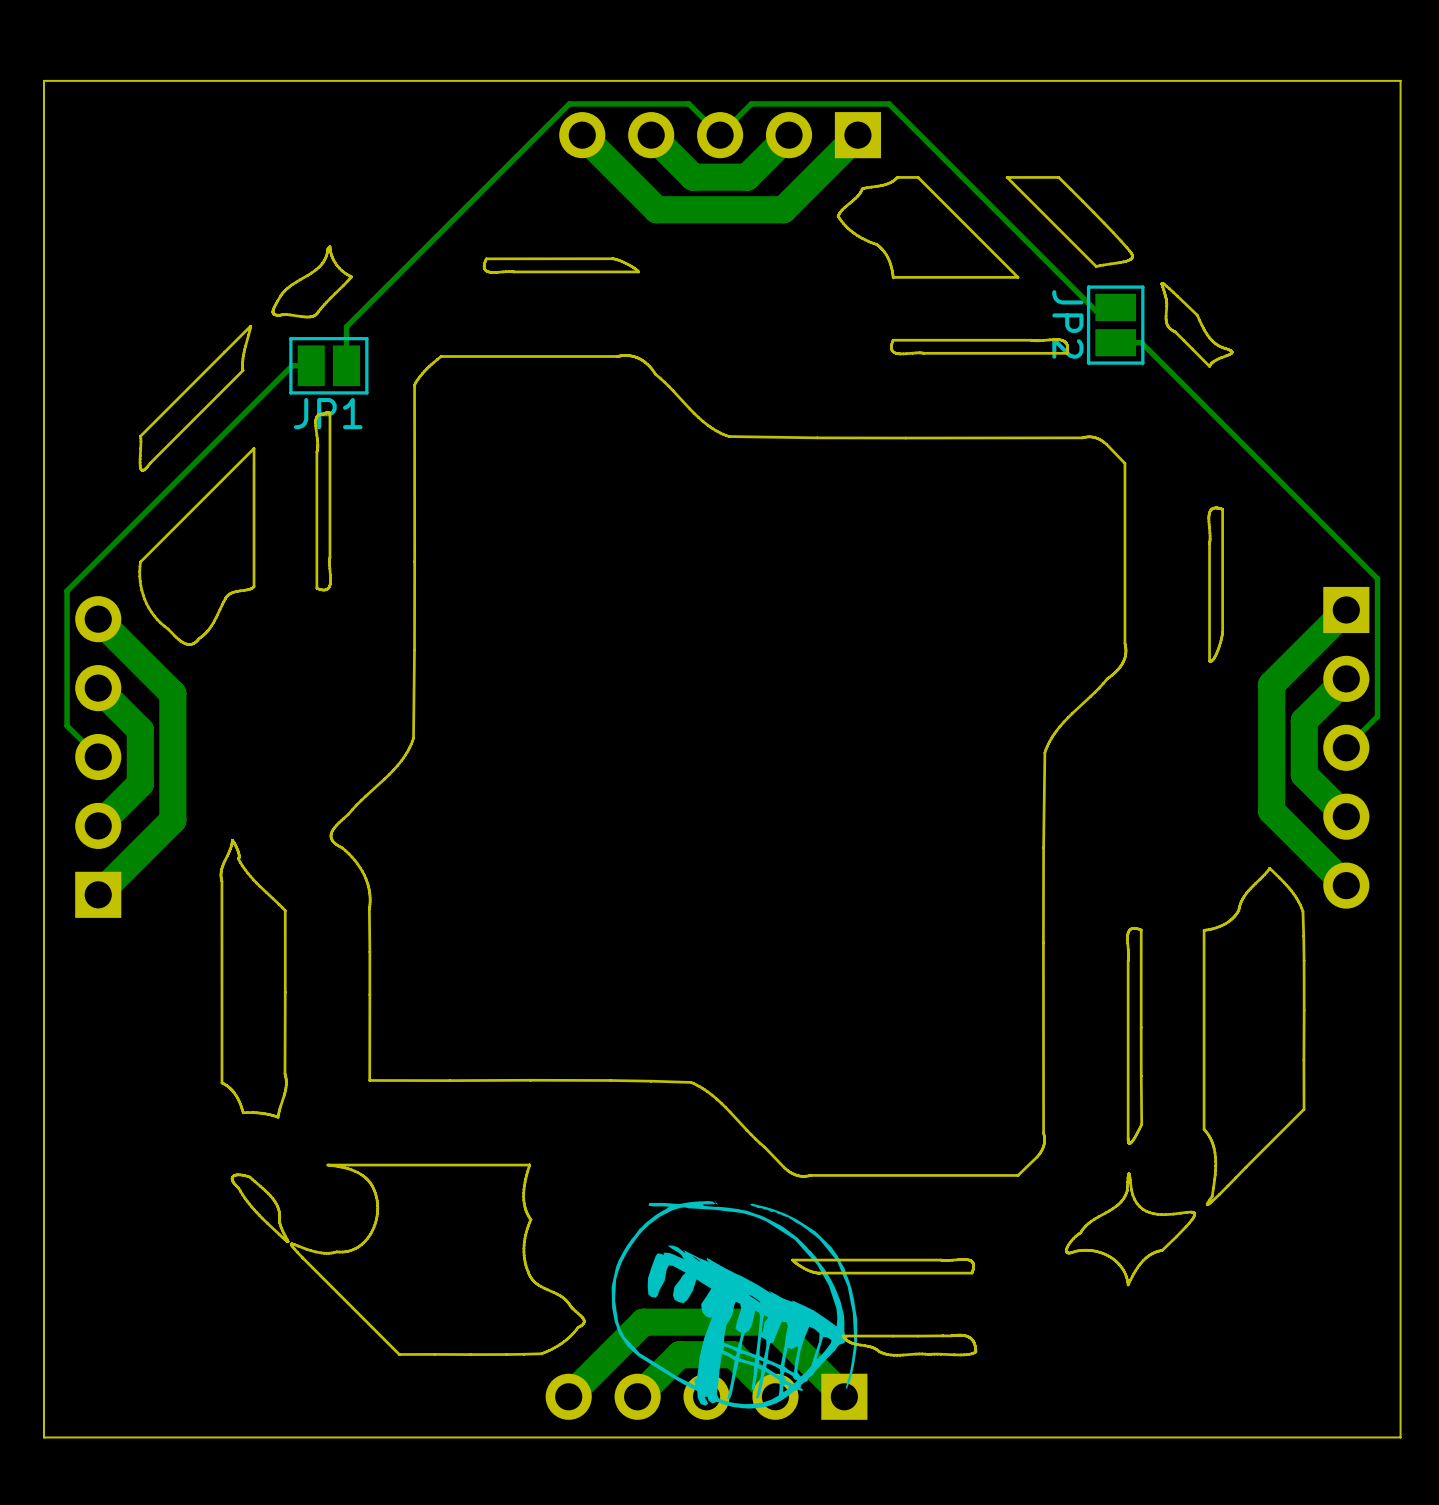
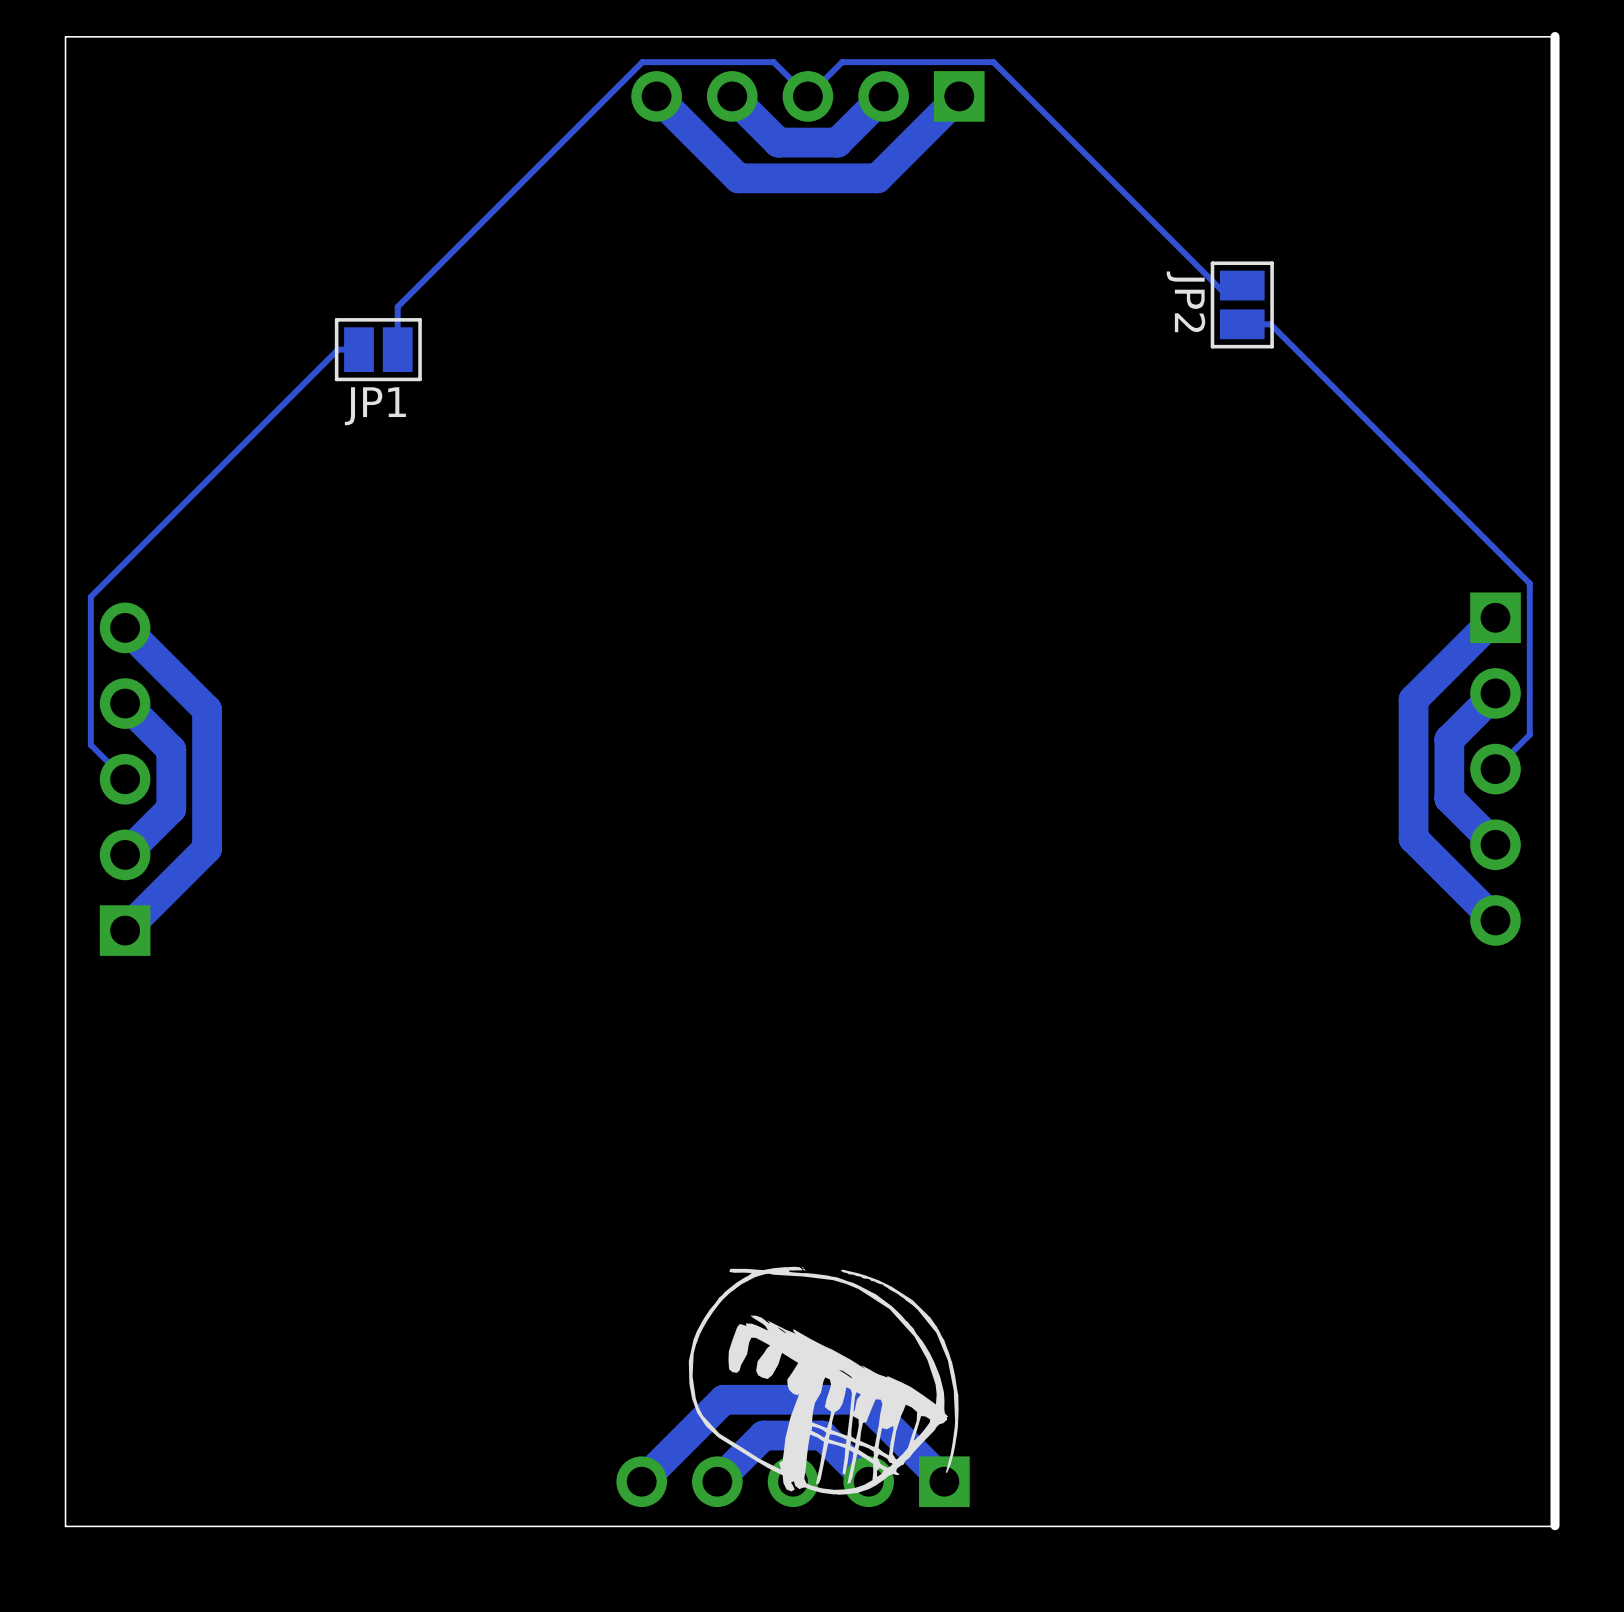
board edge width: thin (1400, 80) (1400, 1437) -> thick (1555, 36) (1555, 1526)
board edge: (918, 177) (897, 177) (885, 184) (862, 188) (838, 216) (852, 232) (876, 244) (882, 249) (889, 261) (893, 277) (1018, 277) (918, 177) -> none
board edge: (1058, 177) (1007, 177) (1096, 266) (1131, 258) (1131, 253) (1121, 241) (1058, 177) -> none
board edge: (328, 248) (329, 246) (332, 257) (338, 266) (351, 276) (314, 315) (306, 317) (274, 314) -> none
board edge: (327, 249) (321, 264) (285, 289) (272, 311) -> none
board edge: (638, 271) (626, 263) (612, 258) (486, 258) (484, 266) (485, 270) (491, 272) (638, 271) -> none
board edge: (1162, 284) (1166, 301) (1166, 321) (1170, 328) (1209, 366) (1213, 361) (1231, 353) -> none
board edge: (1163, 284) (1197, 315) (1212, 340) (1232, 351) -> none
board edge: (250, 326) (140, 436) (141, 469) (146, 468) (243, 370) (243, 355) (250, 326) -> none
board edge: (1056, 339) (1065, 342) (1067, 353) (900, 353) (893, 352) (891, 348) (893, 340) (1056, 339) -> none
board edge: (627, 355) (636, 357) (645, 362) (698, 417) (712, 428) (729, 436) (1091, 436) (1104, 442) (1124, 463) (1125, 657) (1117, 670) (1059, 726) (1044, 752) (1044, 1141) (1039, 1154) (1018, 1175) (797, 1175) (784, 1167) (716, 1099) (691, 1082) (369, 1080) (369, 891) (366, 878) (357, 863) (345, 850) (333, 841) (330, 835) (336, 825) (397, 765) (406, 752) (413, 738) (414, 385) (424, 371) (441, 356) (627, 355) -> none
board edge: (329, 413) (330, 580) (329, 587) (323, 590) (316, 588) (317, 446) (315, 421) (317, 415) (321, 414) -> none
board edge: (254, 448) (254, 586) (227, 595) (207, 631) (193, 643) (185, 643) (160, 622) (148, 607) (140, 585) (140, 562) (254, 448) -> none
board edge: (1215, 507) (1210, 510) (1208, 517) (1209, 661) -> none
board edge: (1217, 508) (1222, 509) (1222, 632) (1217, 650) (1211, 661) -> none
board edge: (232, 840) (220, 874) (221, 1082) (234, 1093) (243, 1112) (261, 1113) (278, 1117) (286, 1083) (285, 910) (253, 880) (238, 858) -> none
board edge: (232, 840) (239, 856) -> none
board edge: (1128, 1142) (1127, 937) (1129, 930) (1134, 928) (1141, 929) (1141, 1124) (1130, 1142) -> none
board edge: (1129, 1174) (1132, 1194) (1142, 1209) (1157, 1214) (1191, 1212) (1194, 1213) (1186, 1226) (1162, 1250) (1151, 1254) (1143, 1260) (1128, 1284) (1122, 1268) (1109, 1256) (1092, 1250) (1068, 1253) (1066, 1250) (1071, 1240) (1086, 1225) (1121, 1201) (1127, 1190) (1128, 1174) -> none
board edge: (1207, 1204) (1212, 1196) (1215, 1161) (1212, 1142) (1204, 1129) (1204, 930) (1219, 926) (1232, 918) (1238, 910) (1244, 895) (1269, 868) (1291, 890) (1302, 911) (1304, 1109) (1207, 1204) -> none
board edge: (287, 1240) (280, 1224) (277, 1207) (270, 1195) (249, 1177) (240, 1174) (233, 1176) (233, 1182) (251, 1207) (287, 1241) -> none
board edge: (291, 1243) (321, 1252) (345, 1251) (361, 1244) (372, 1229) (377, 1205) (370, 1183) (363, 1176) (354, 1171) (327, 1165) (529, 1165) (523, 1192) (524, 1206) (530, 1219) (524, 1245) (526, 1268) (534, 1282) (564, 1298) (582, 1317) (584, 1322) (564, 1341) (541, 1353) (399, 1354) (291, 1244) -> none
board edge: (969, 1260) (792, 1260) (805, 1269) (818, 1273) (972, 1273) (973, 1264) -> none
board edge: (962, 1335) (972, 1340) (975, 1351) (963, 1354) (890, 1355) (871, 1347) (851, 1343) (843, 1336) (962, 1335) -> none

